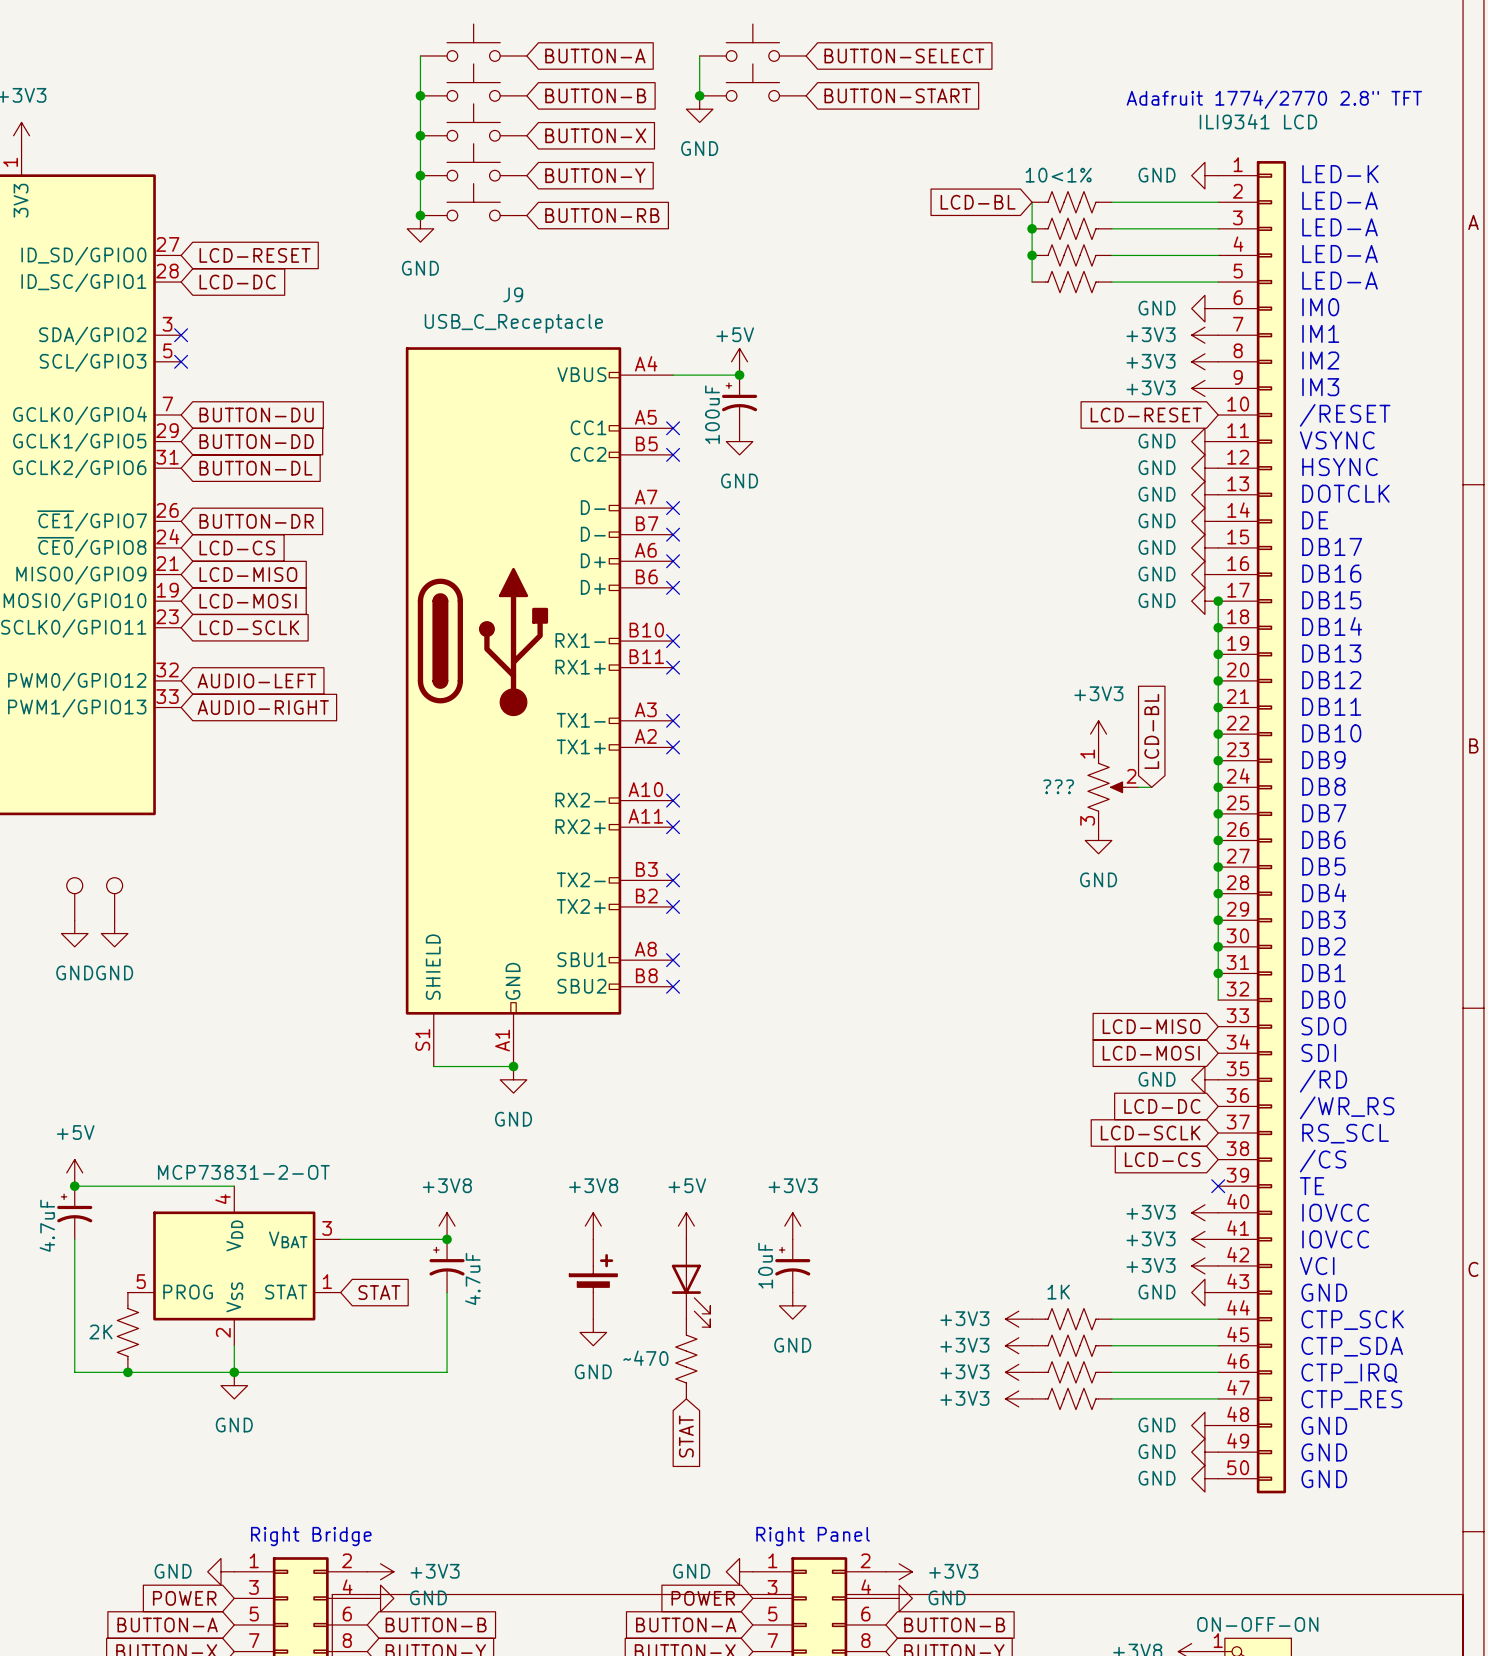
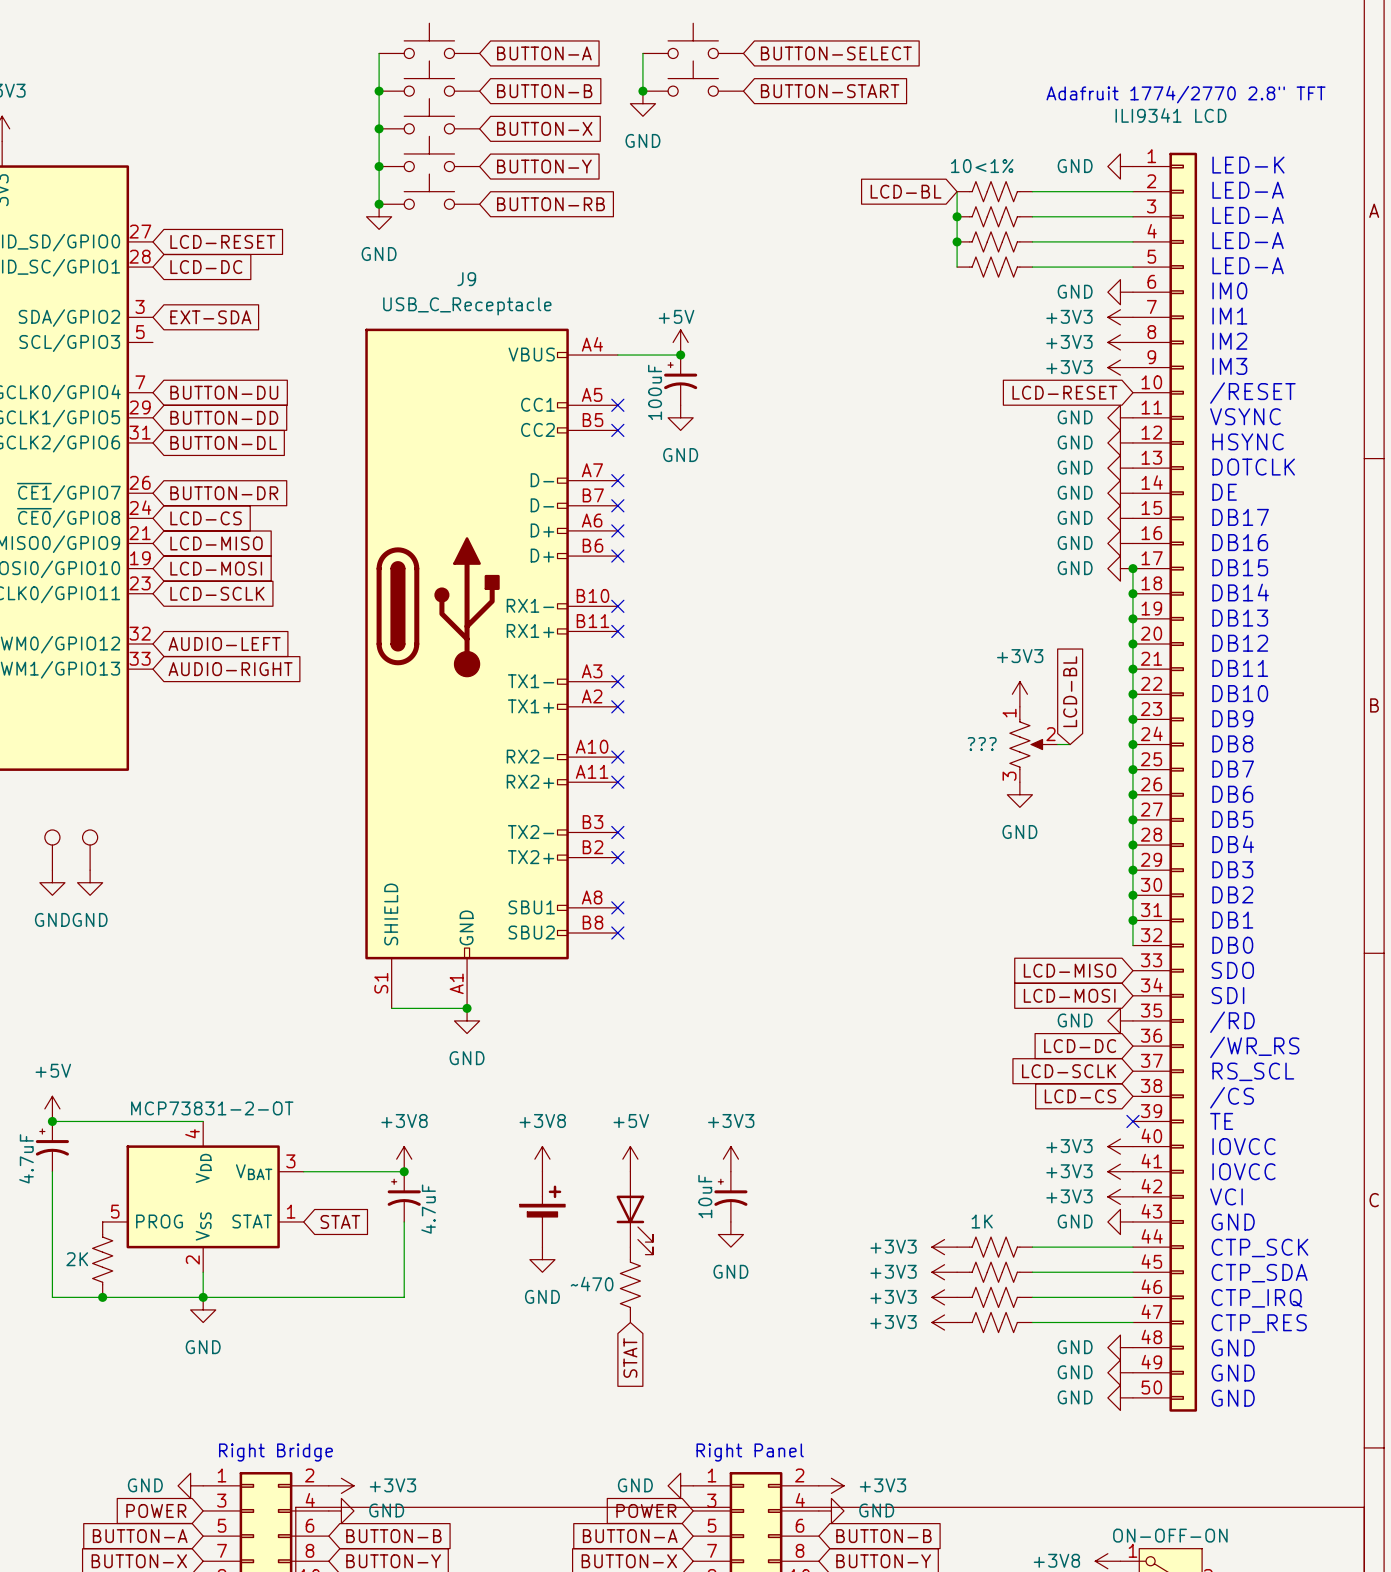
no-connect mark: (181, 335) -> none
global label: none -> EXT-SDA (210, 317)
no-connect mark: (181, 361) -> none

